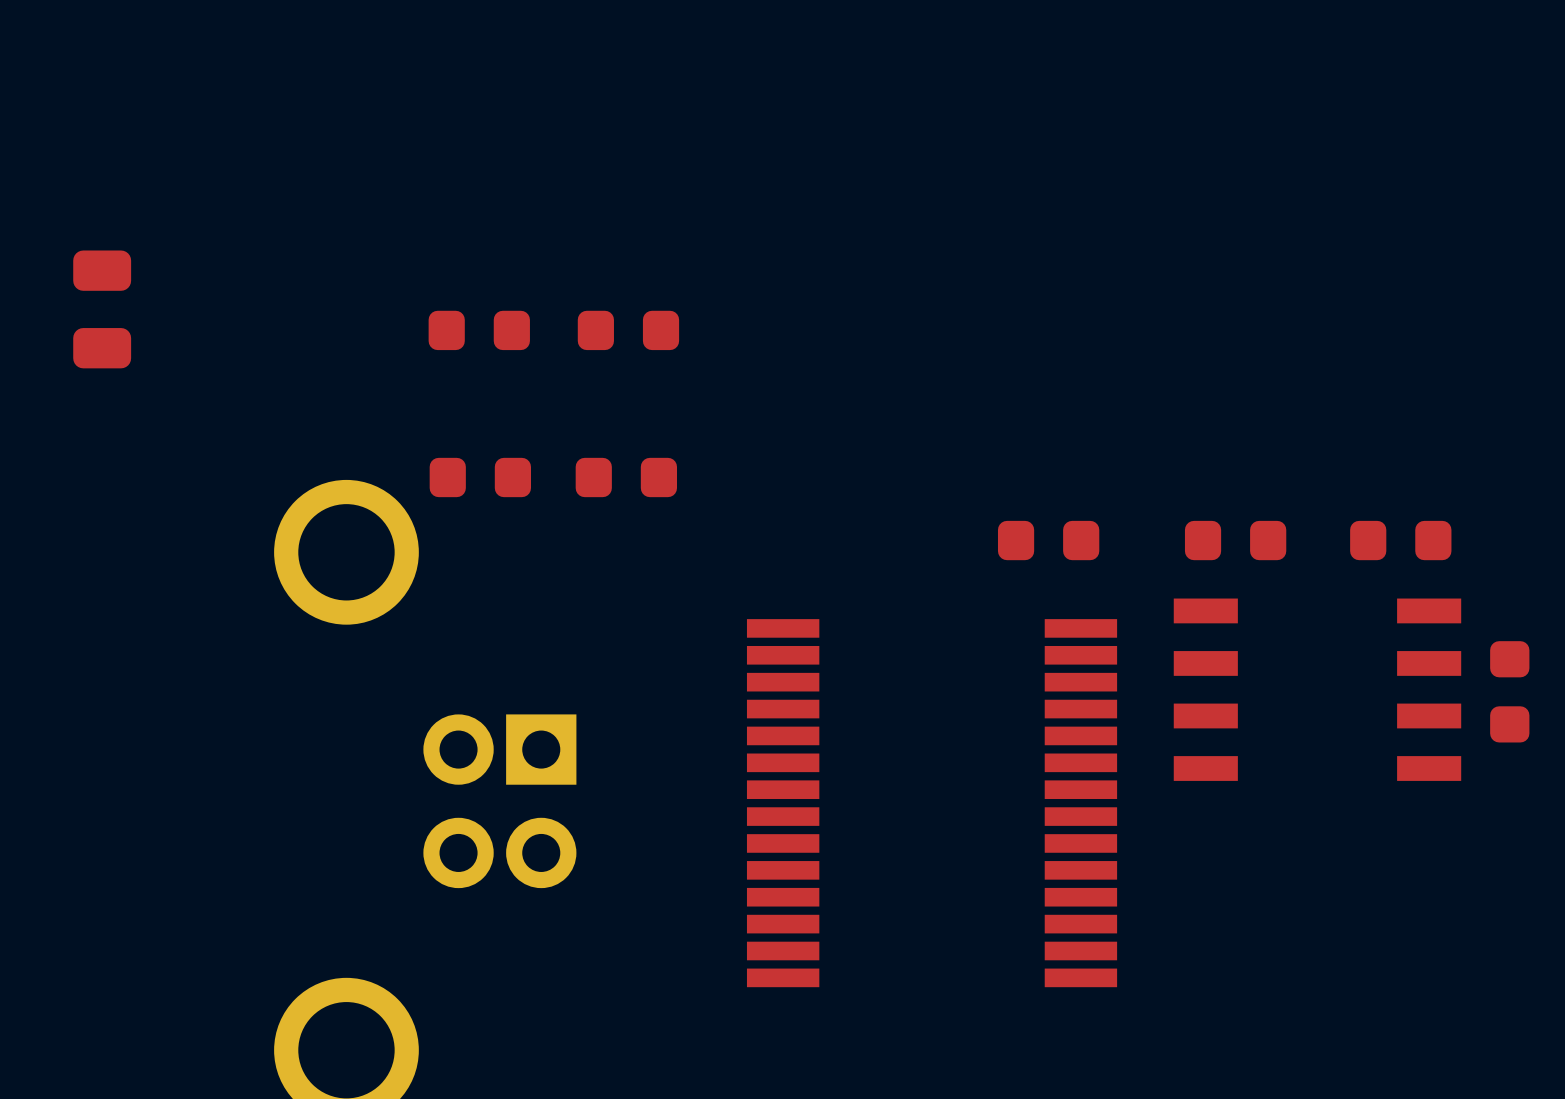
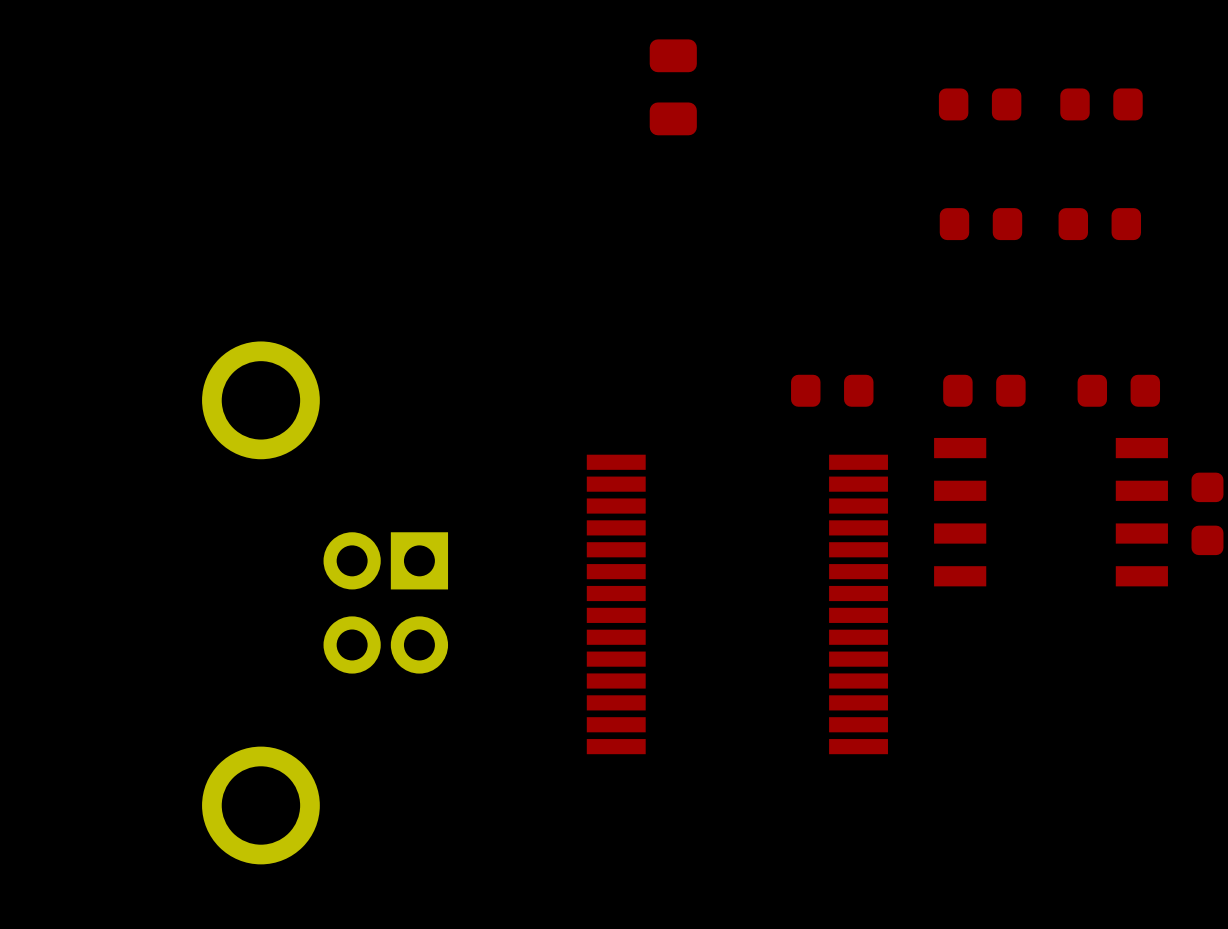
part: none -> (980, 104)
part: none -> (1101, 104)
part position: (102, 309) -> (673, 87)
part: (479, 330) -> none
part: (628, 330) -> none
part: none -> (980, 224)
part: none -> (1099, 224)
part: (480, 477) -> none
part: (626, 477) -> none

